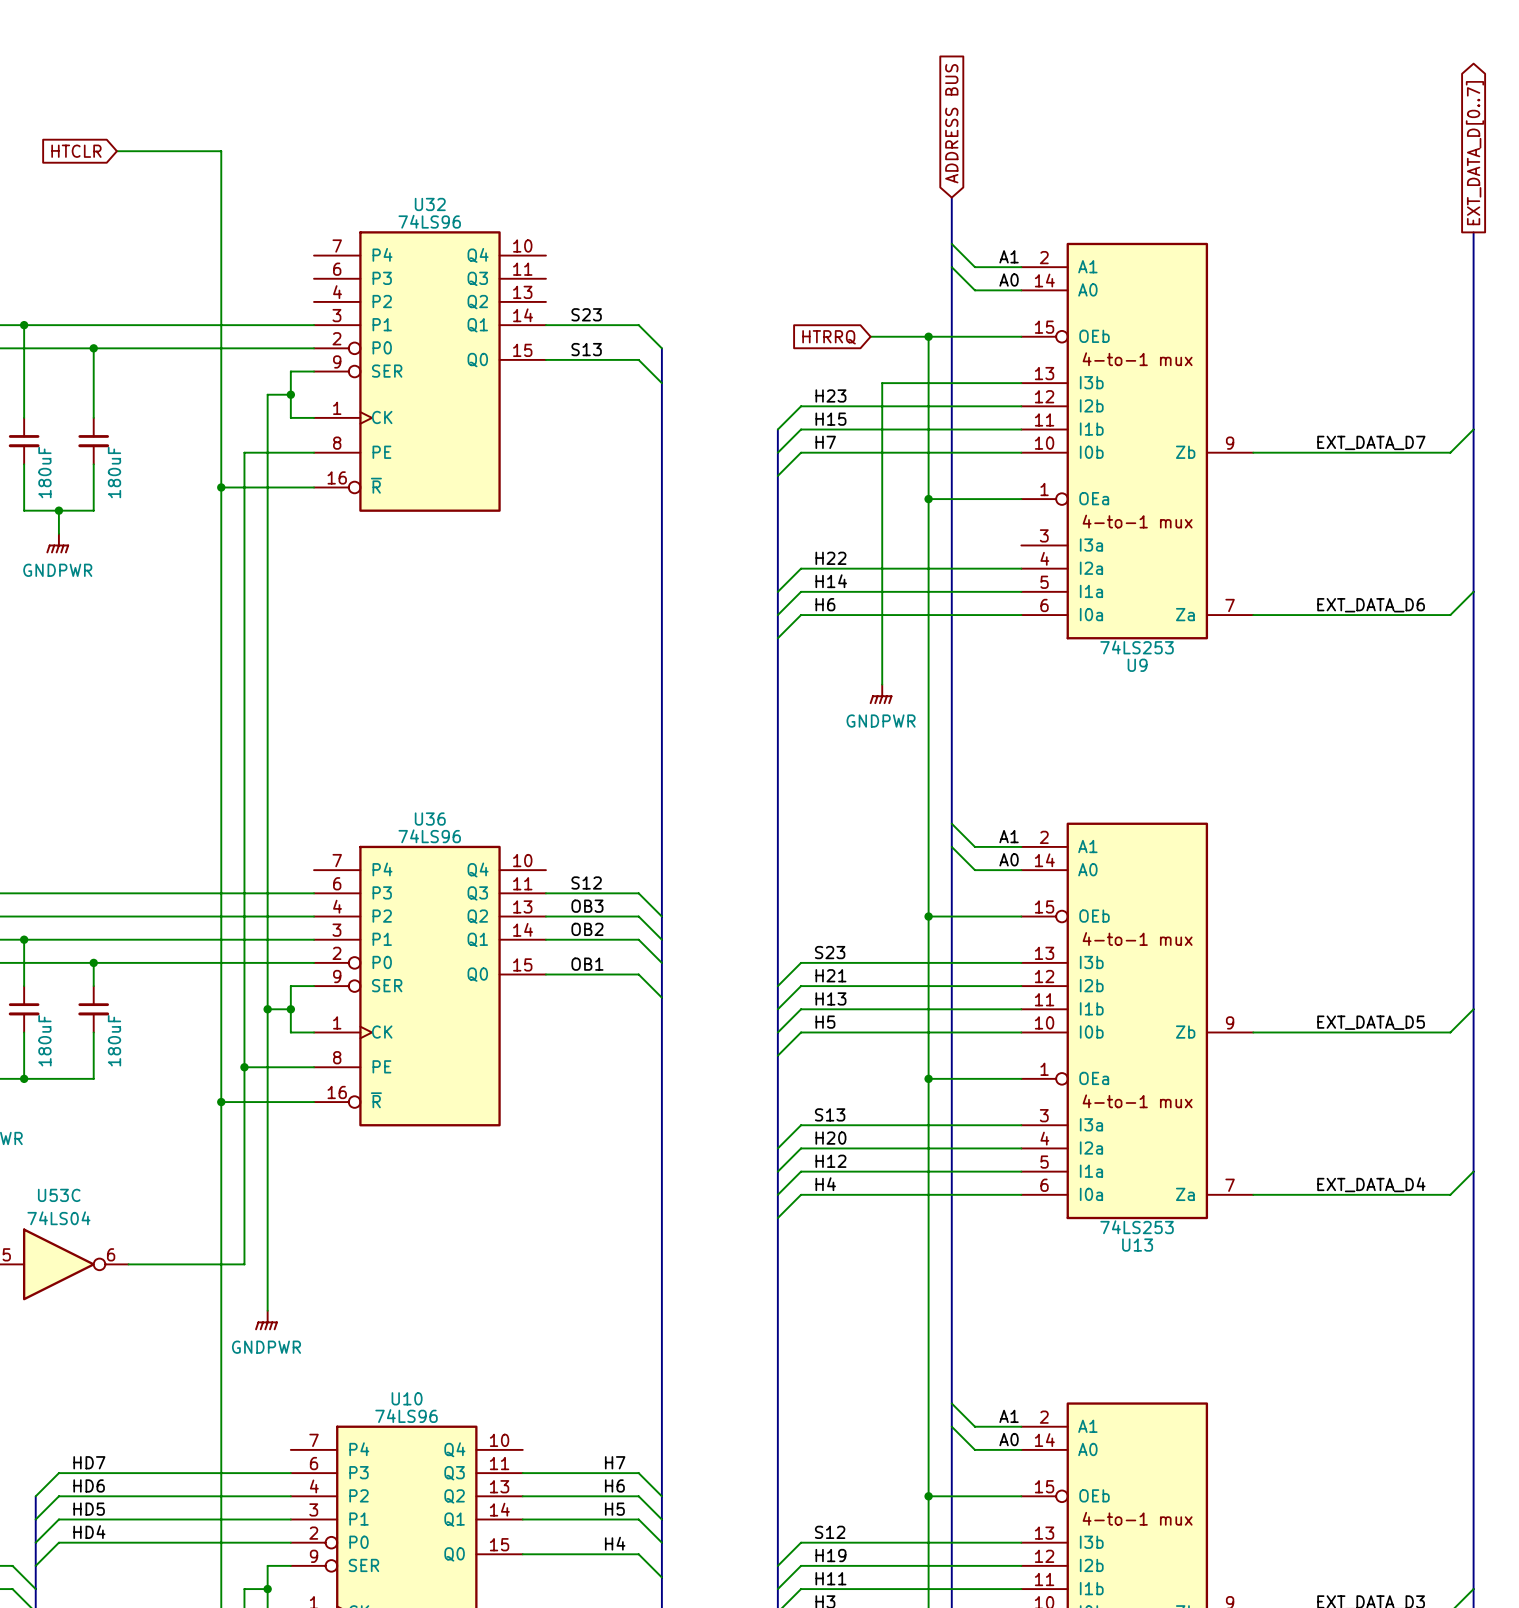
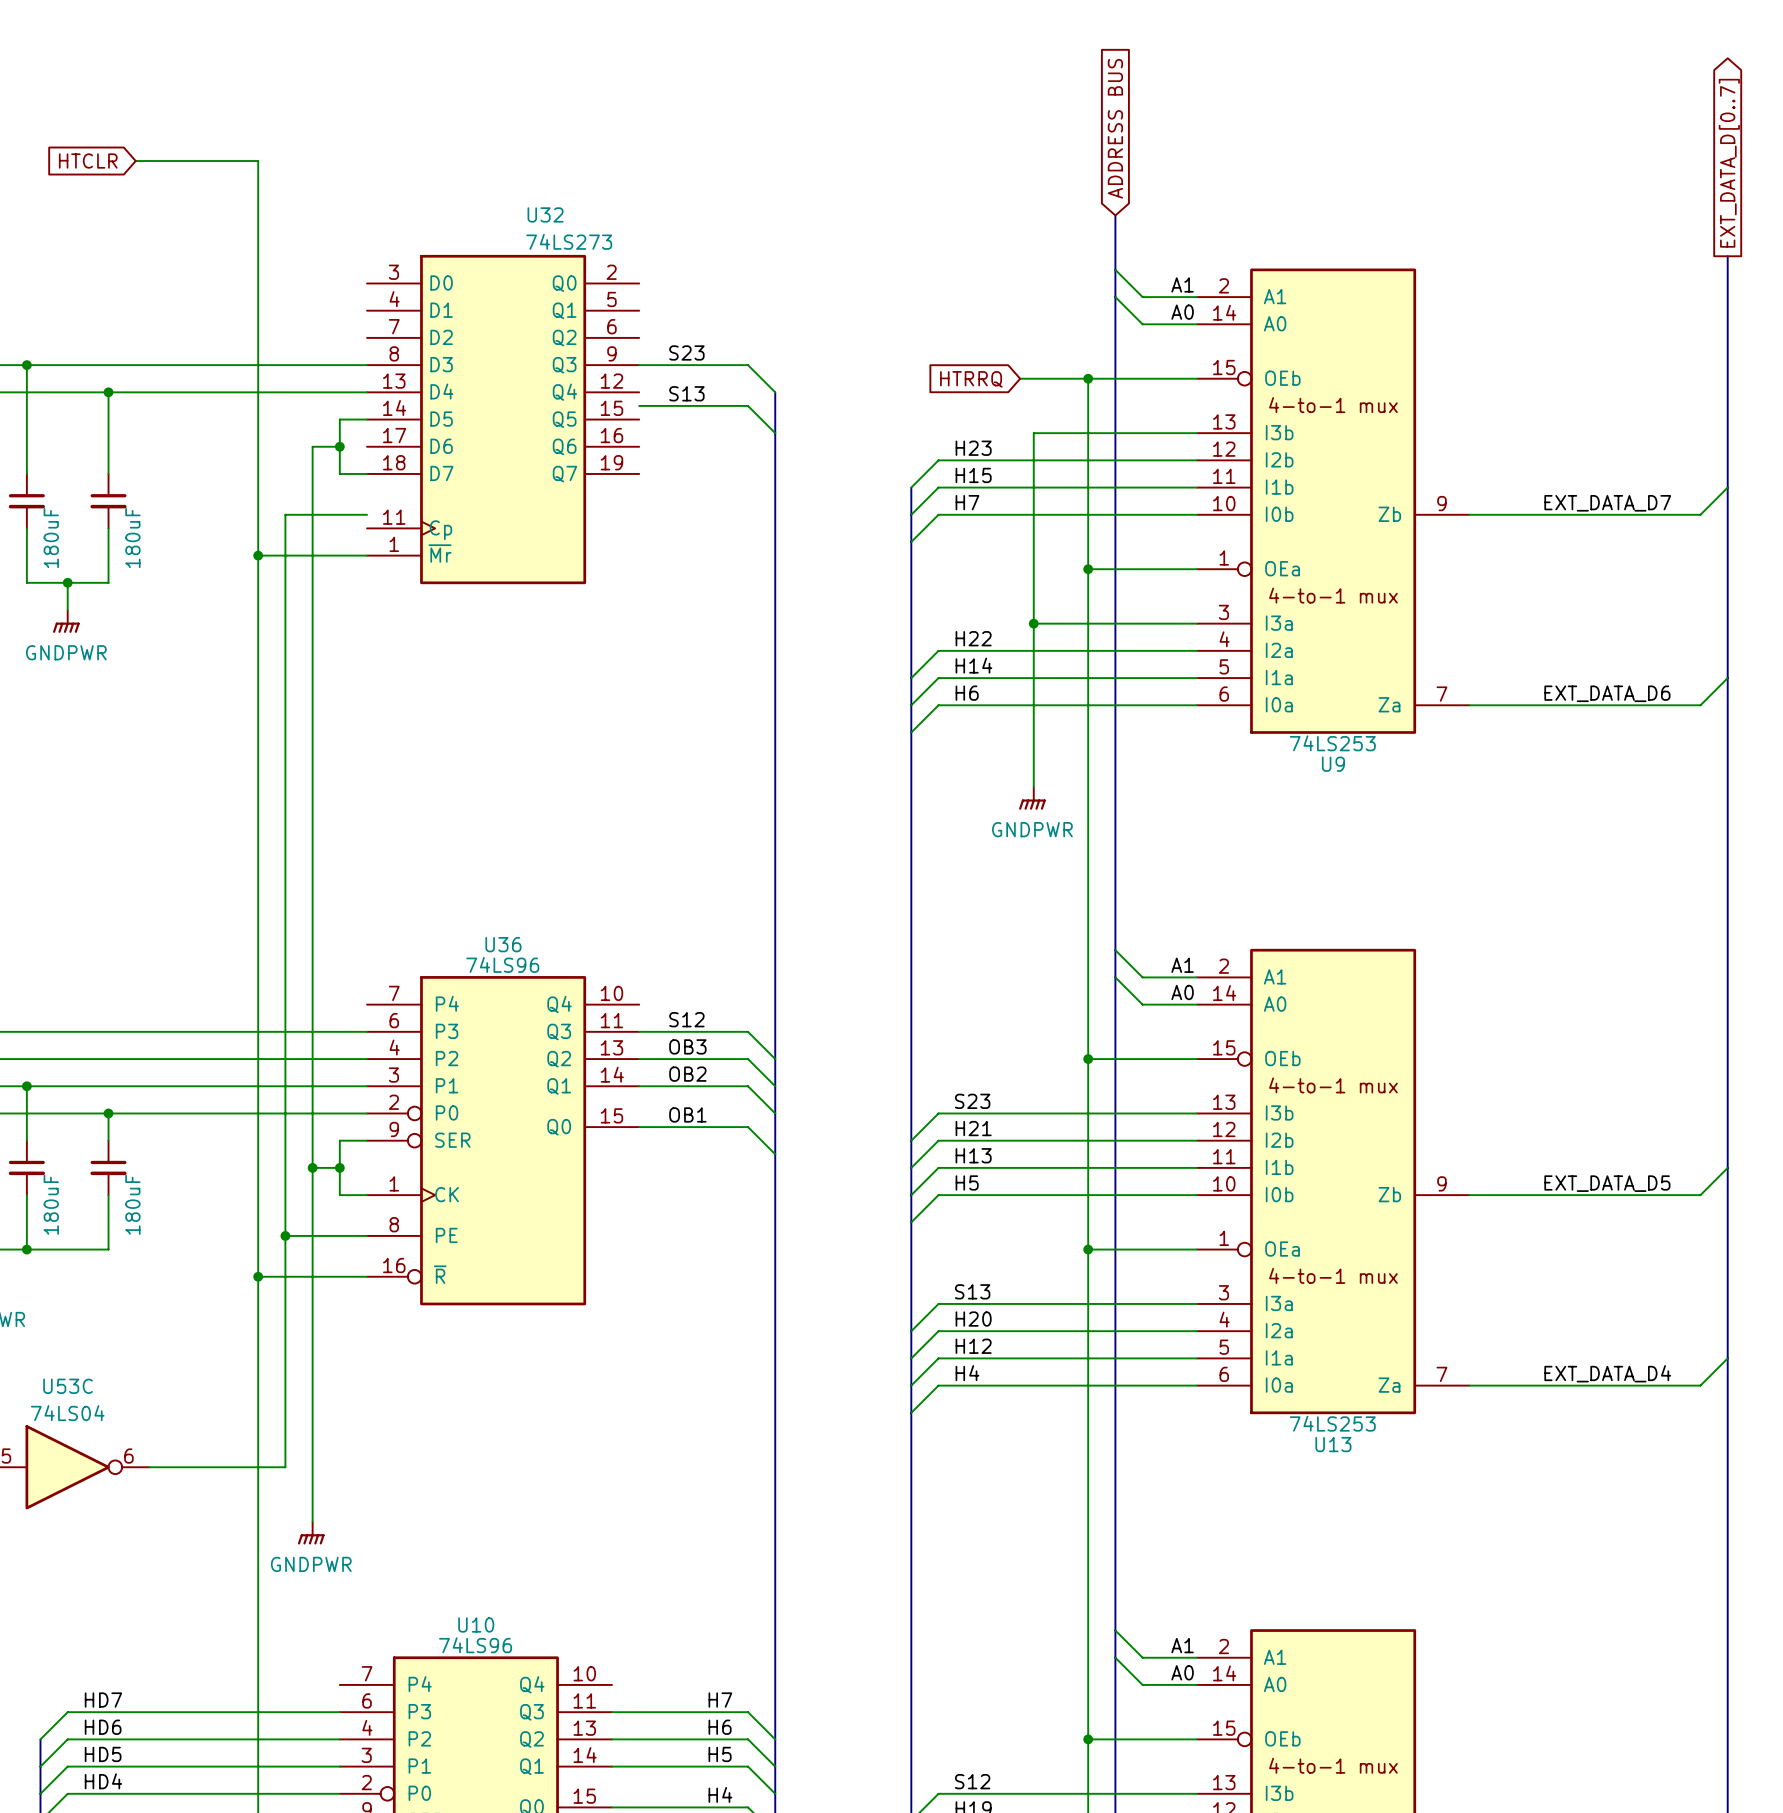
U32 name position: U32 (430, 204) -> U32 (545, 214)
U32 value: 74LS96 (429, 221) -> 74LS273 (569, 241)
U32 symbol: [314, 231, 546, 512] -> [367, 254, 640, 585]
wire: none -> (1033, 623) (1197, 623)
junction: none -> (1033, 623)

